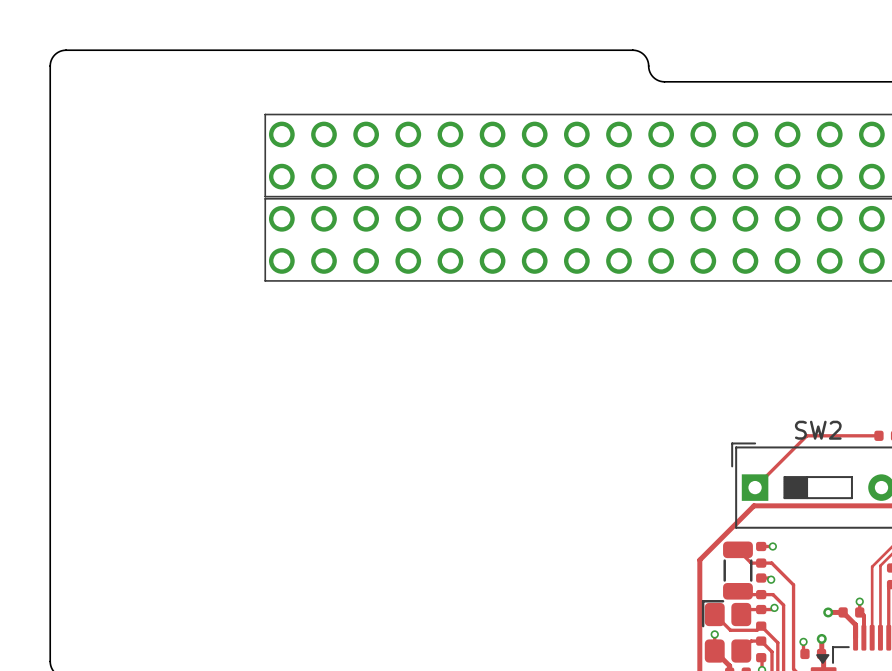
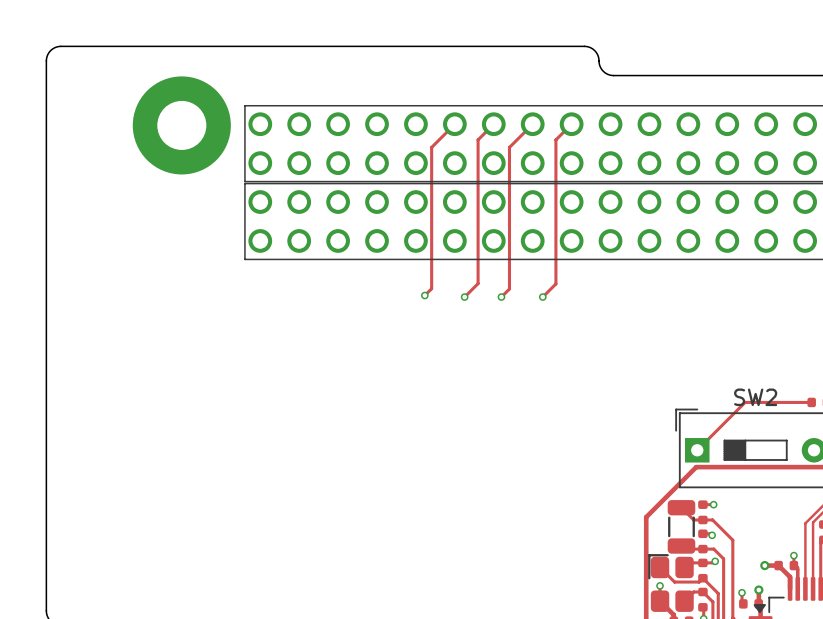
track: none -> (454, 124) (431, 147) (431, 288) (424, 295)
track: none -> (493, 124) (478, 139) (478, 283) (464, 297)
track: none -> (532, 124) (509, 147) (509, 289) (501, 297)
track: none -> (571, 124) (555, 139) (555, 283) (542, 297)
part: none -> (181, 125)
via: none -> (424, 295)
via: none -> (464, 297)
via: none -> (501, 297)
via: none -> (542, 297)

